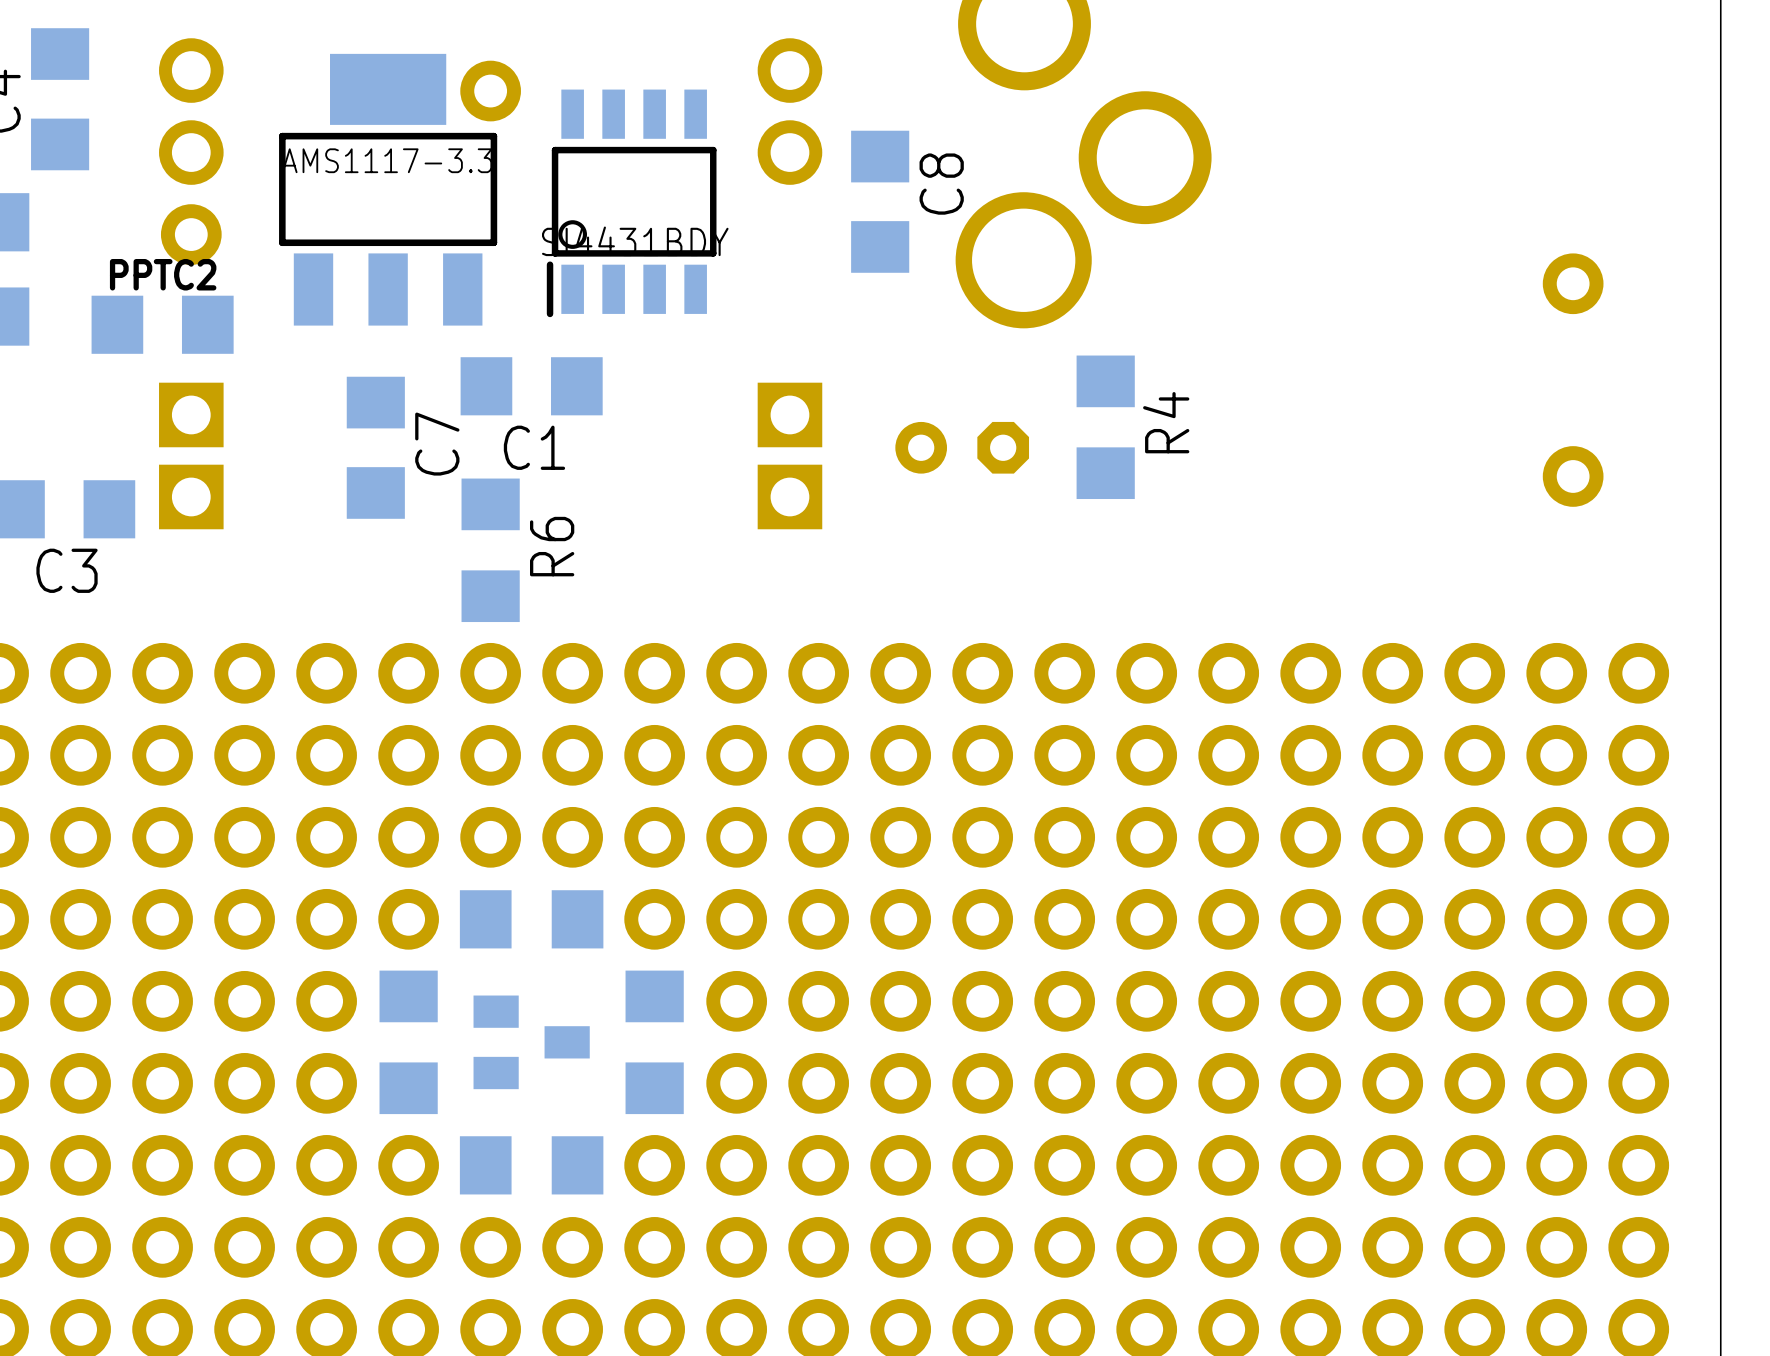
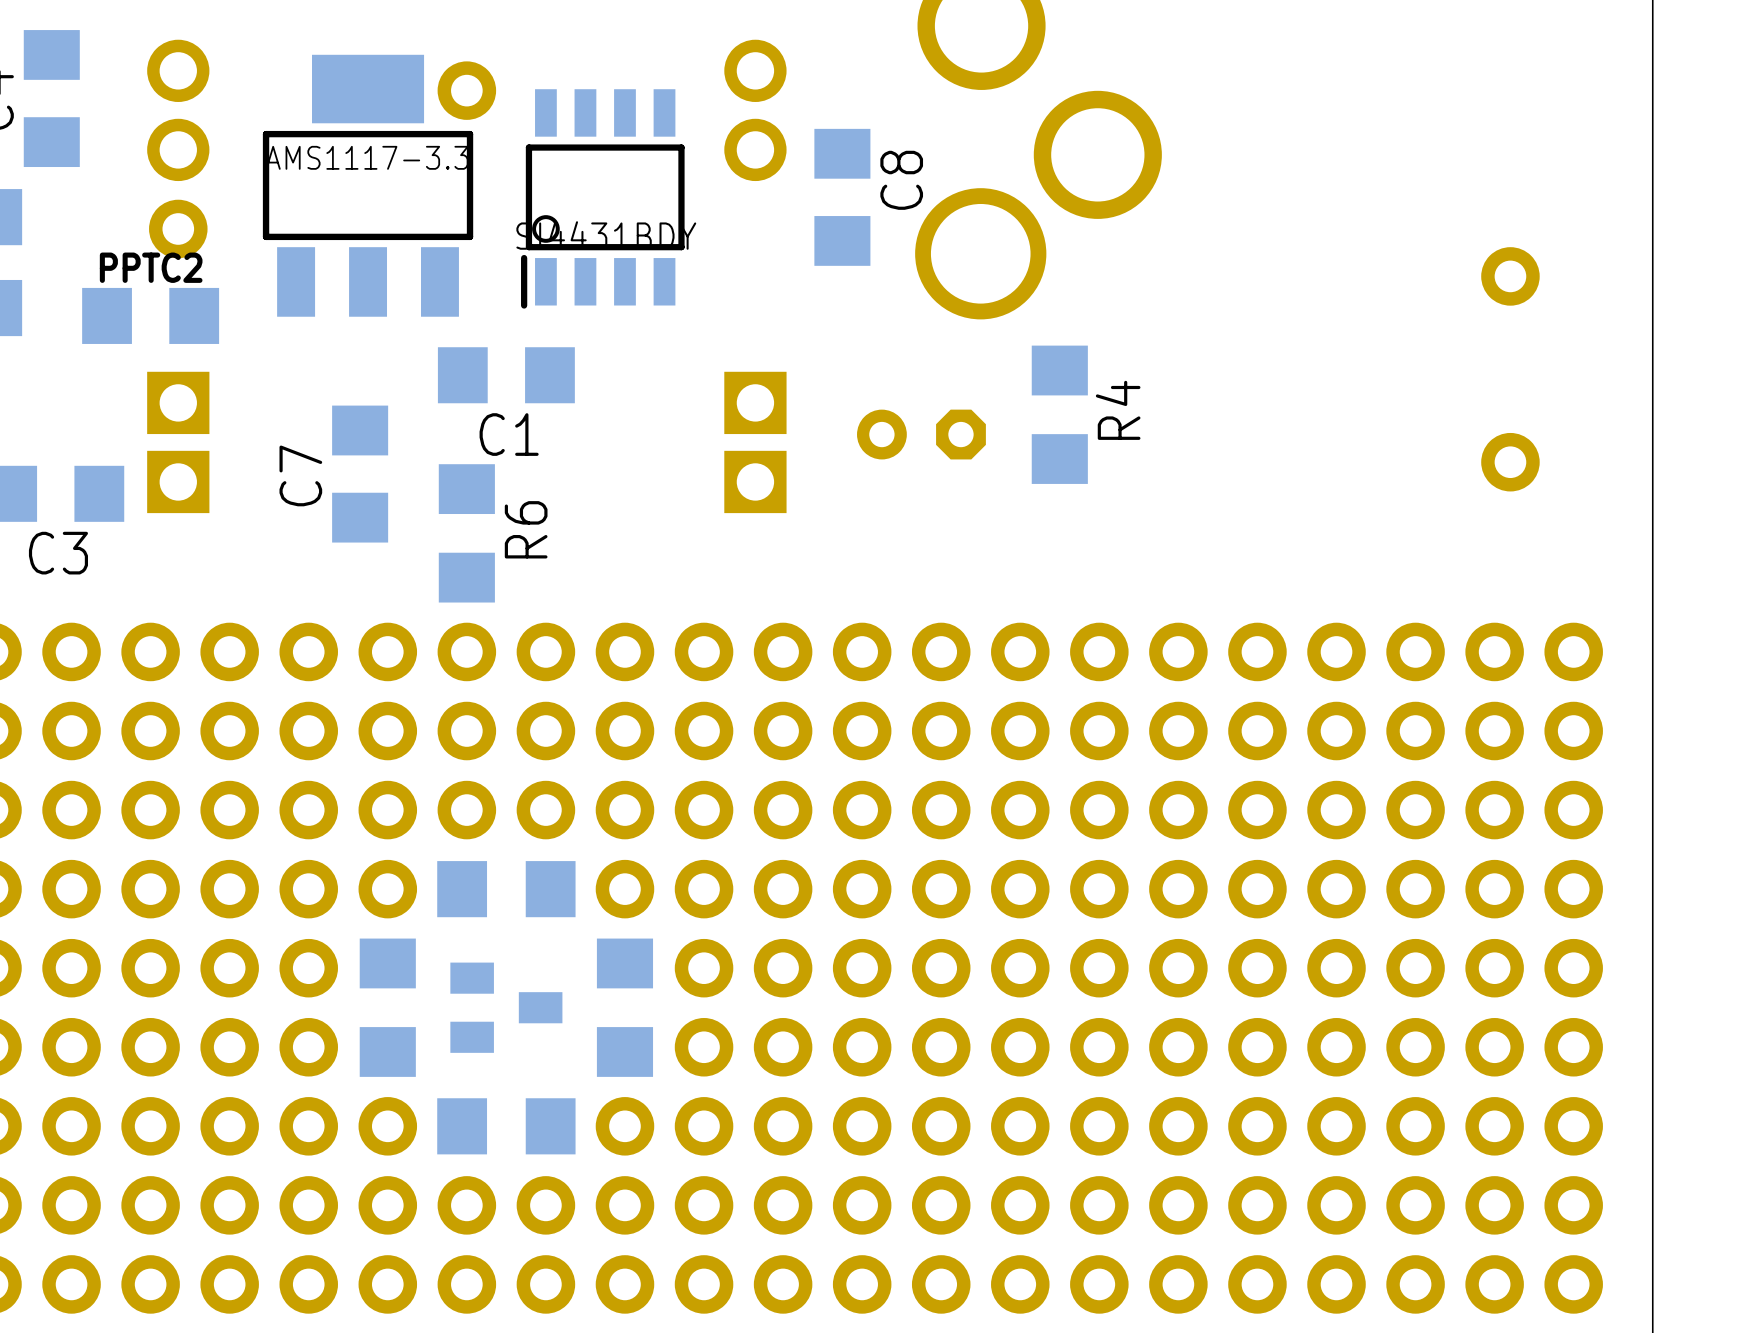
C7 name position: C7 (437, 444) -> C7 (300, 475)
C7 position: (375, 447) -> (360, 474)

